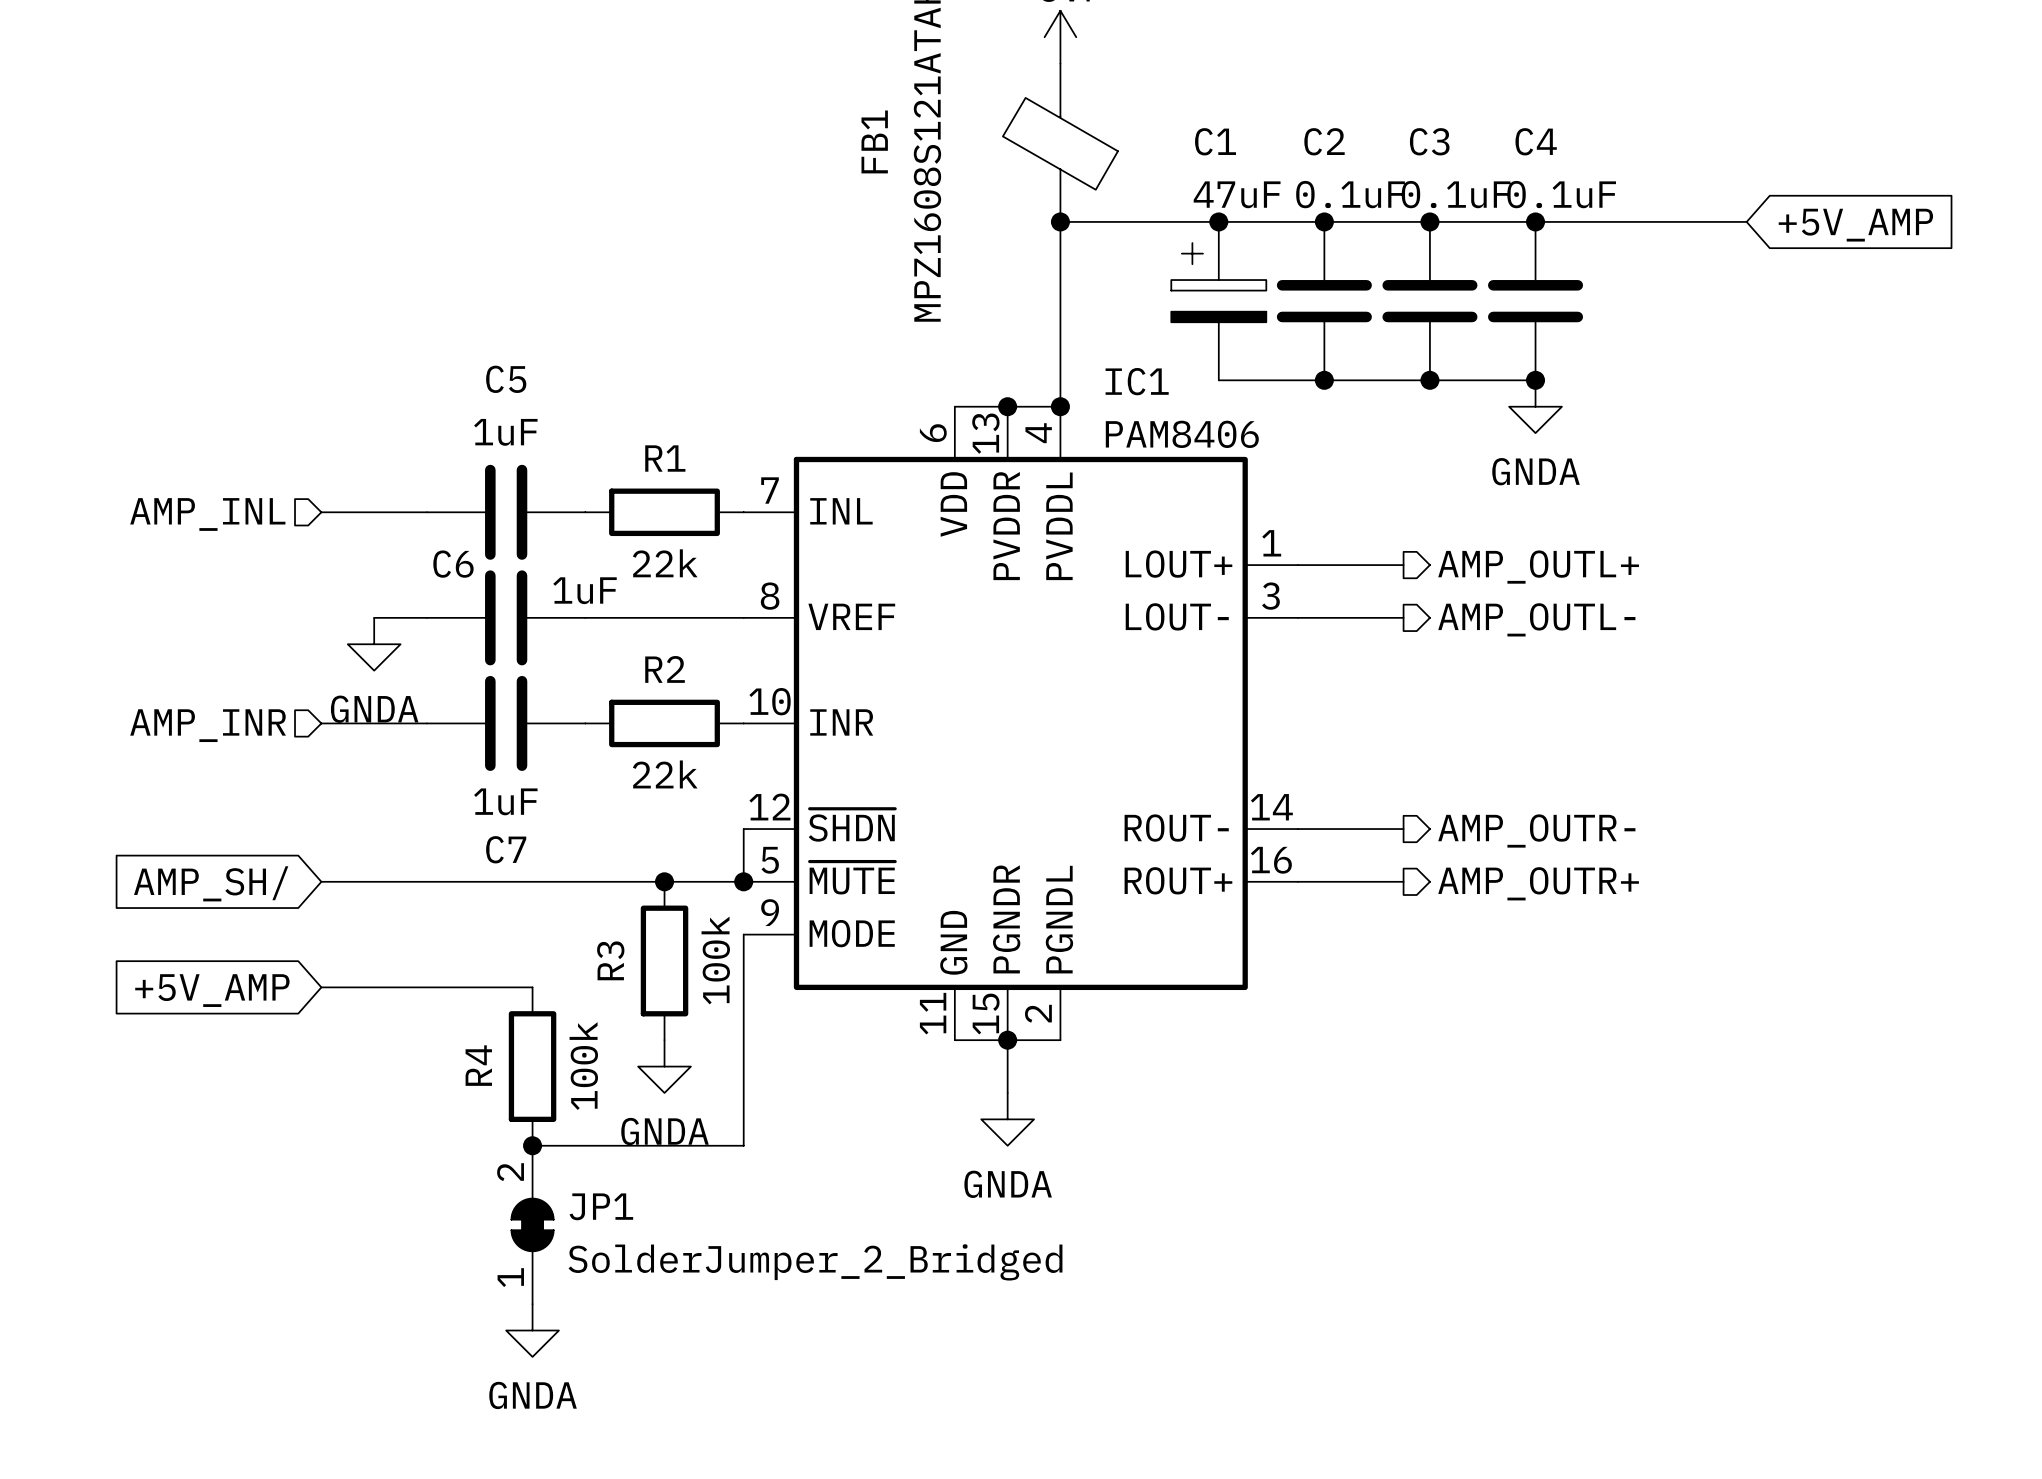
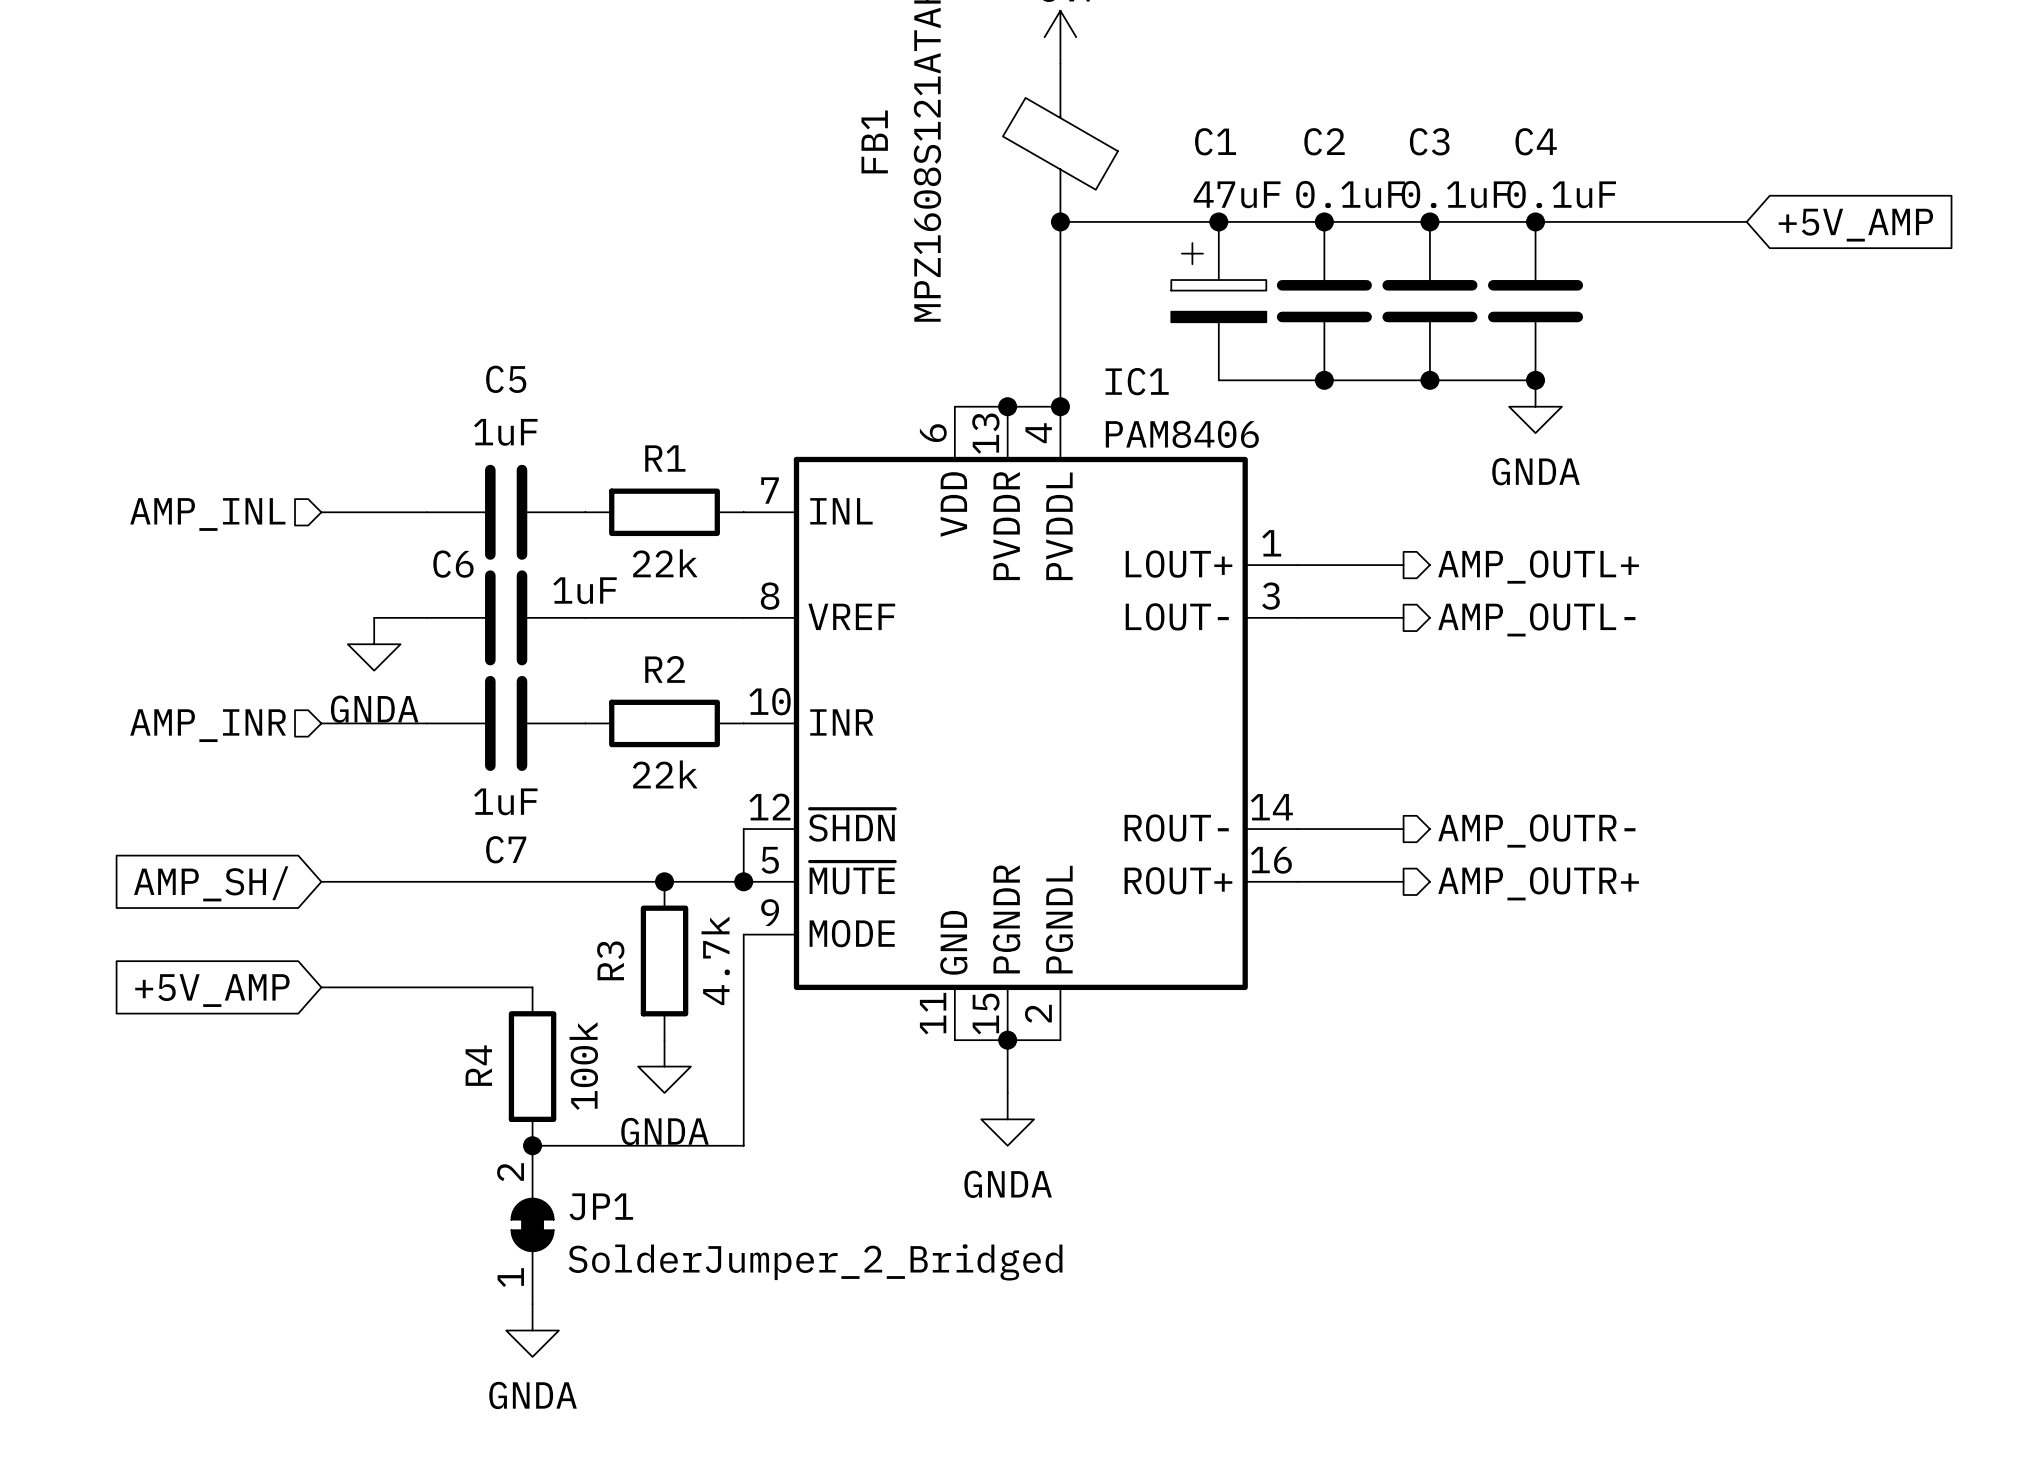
R3 value: 100k (715, 960) -> 4.7k (715, 960)

